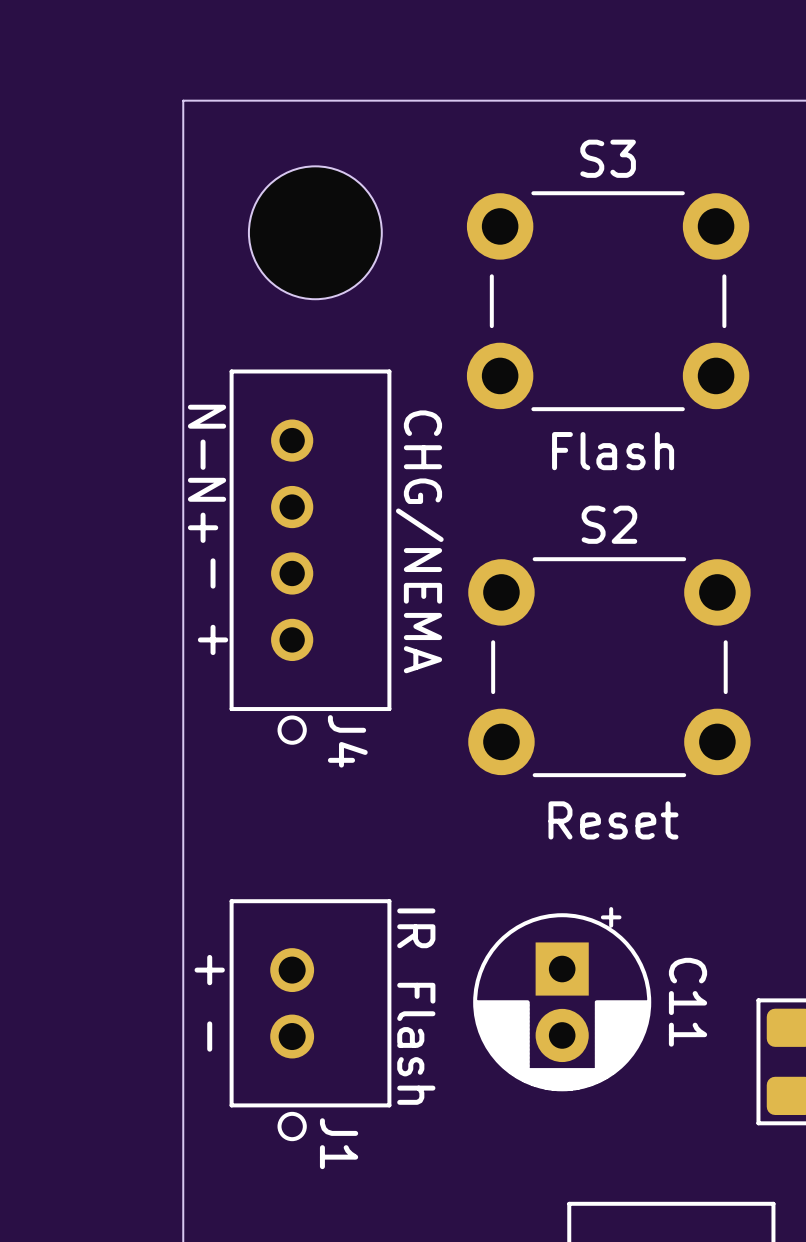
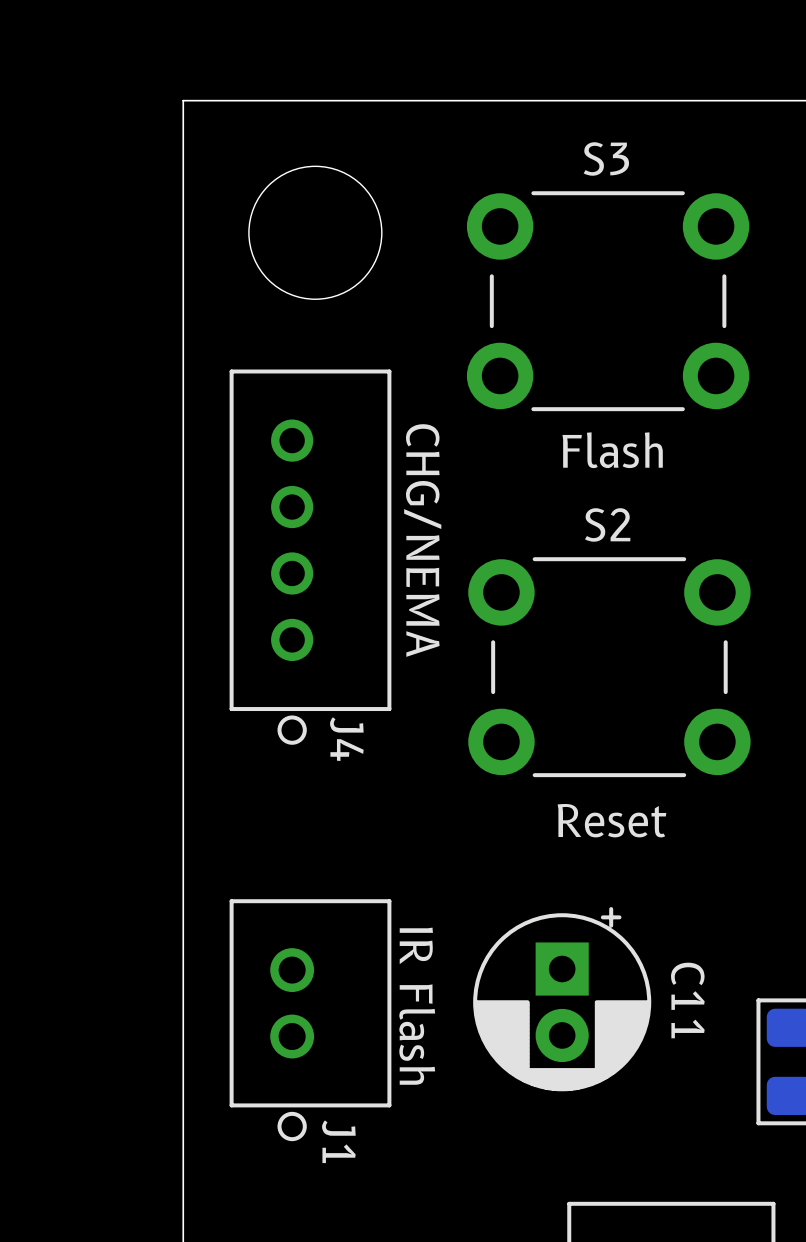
J4 text: N- (207, 437) -> none
J4 text: N+ (207, 510) -> none
J4 text: - (213, 573) -> none
J4 text: + (213, 639) -> none
J1 text: + (209, 970) -> none
J1 text: - (209, 1036) -> none

